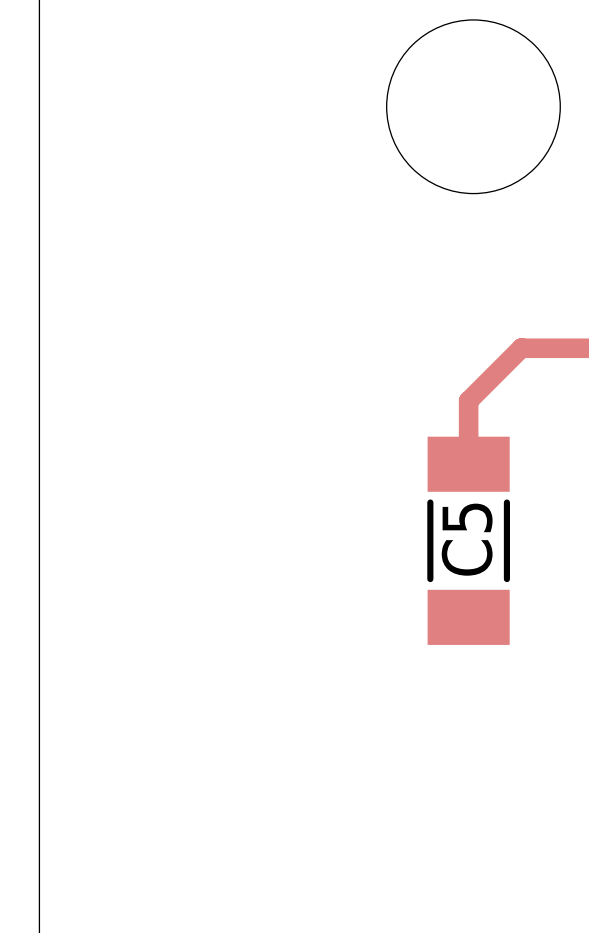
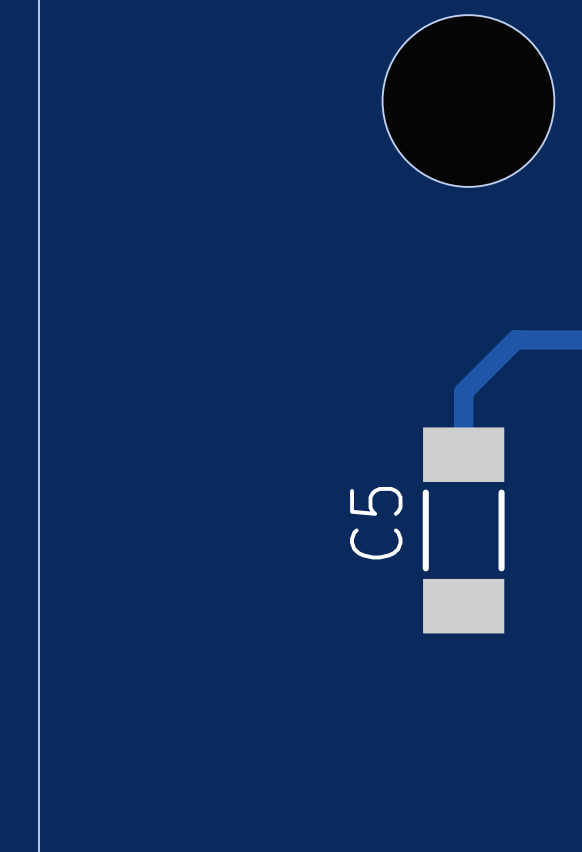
C5 name position: C5 (467, 539) -> C5 (376, 523)

